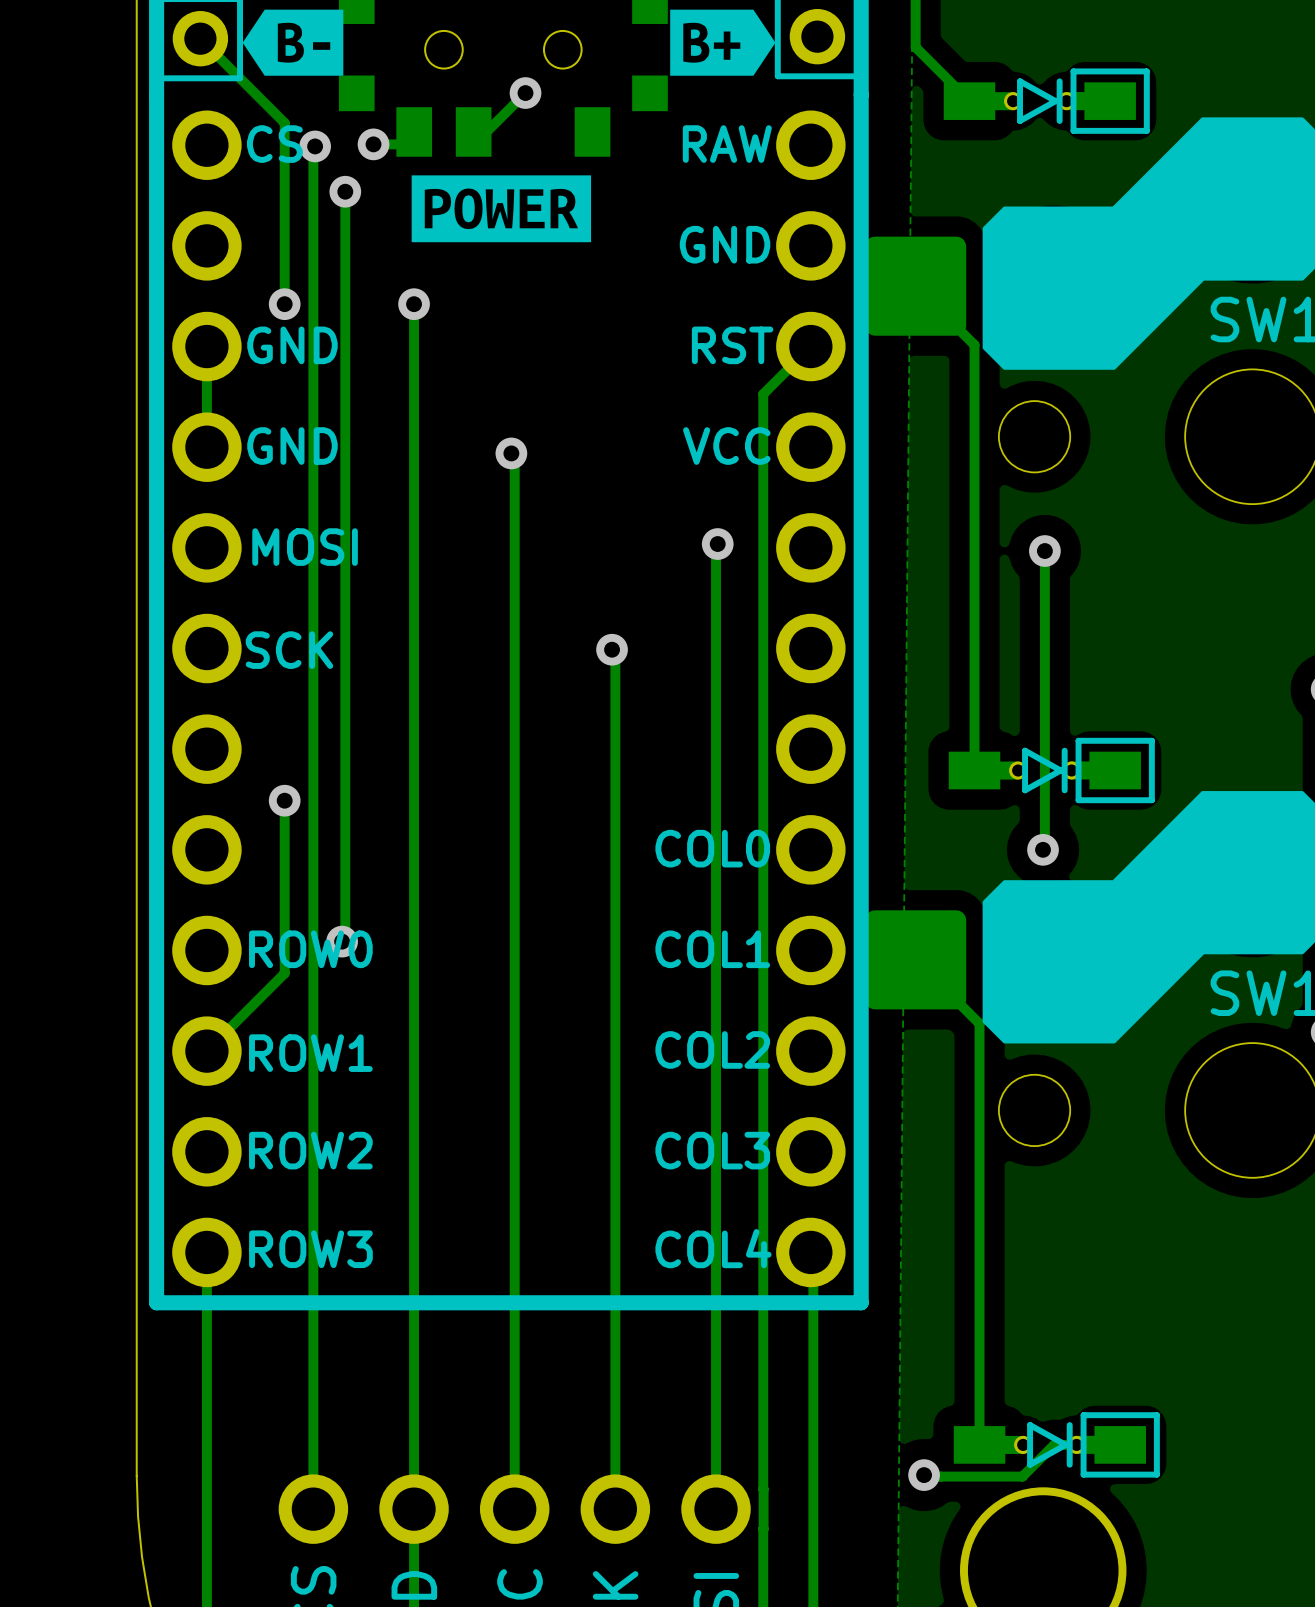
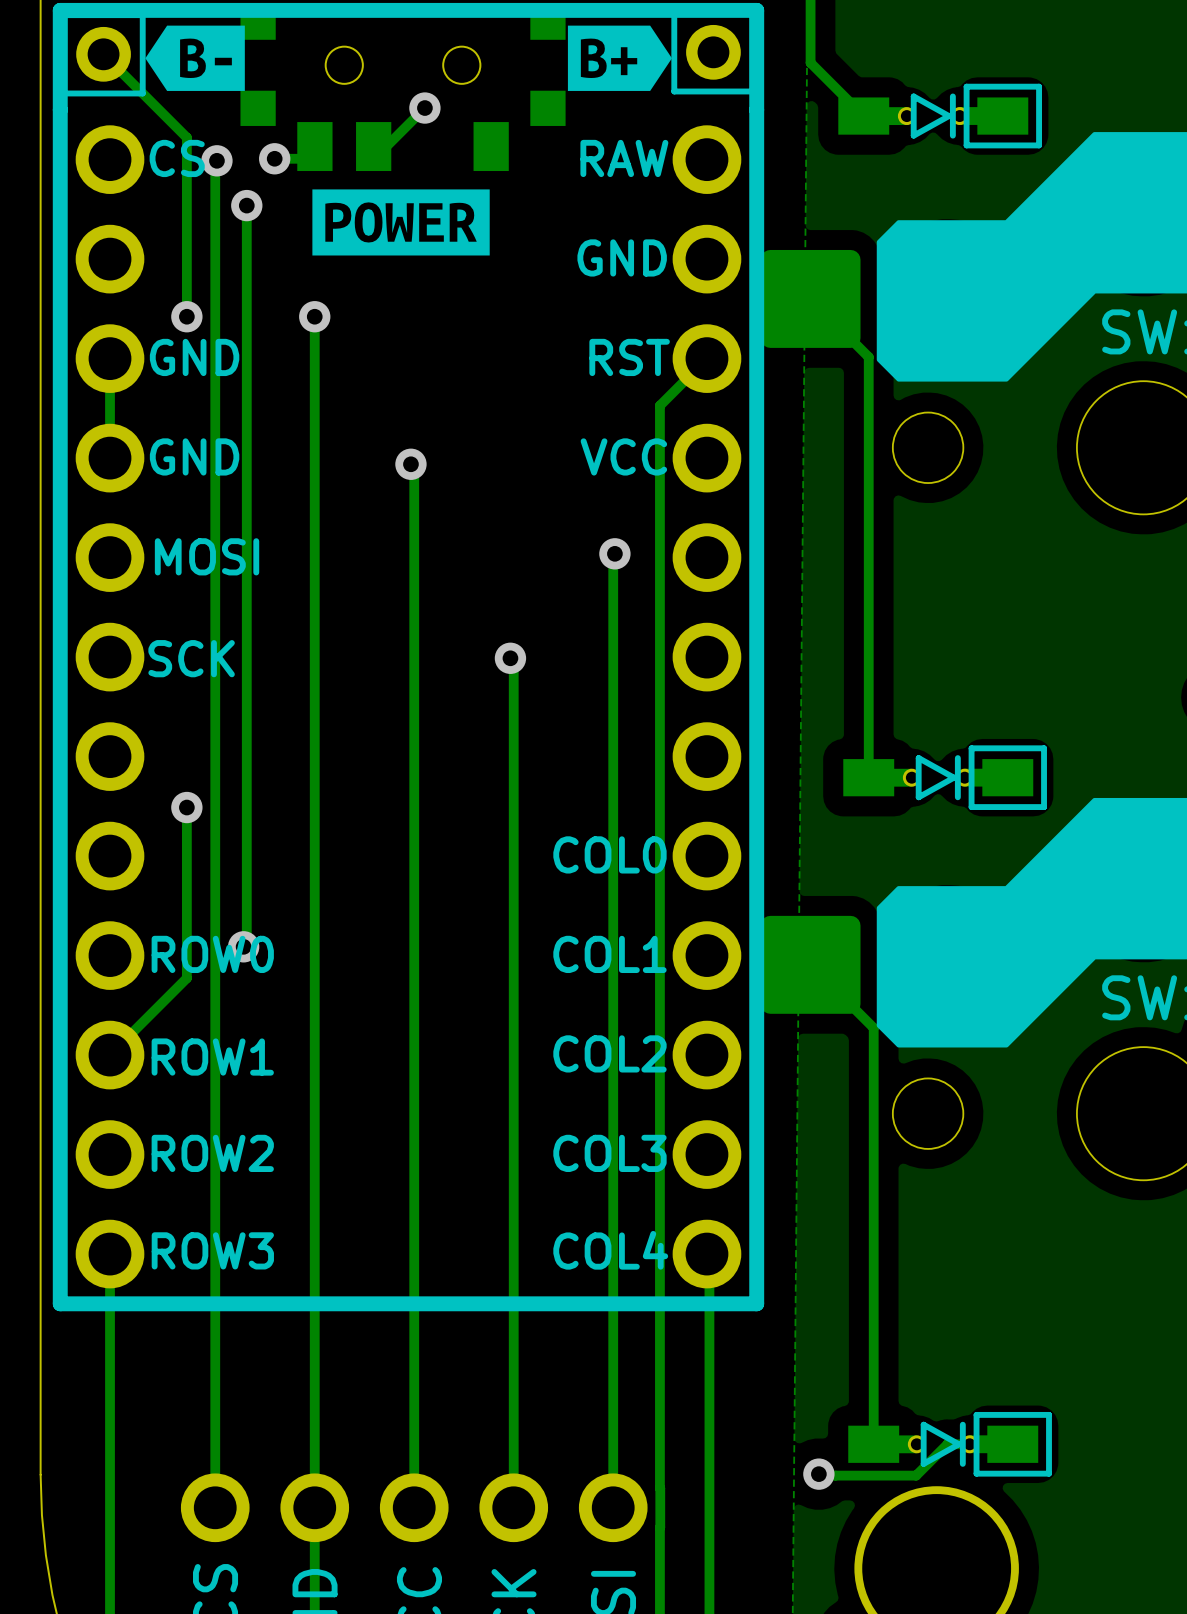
track: (1044, 551) (1044, 847) (1043, 849) -> none
via: (1044, 551) -> none
via: (1043, 849) -> none

